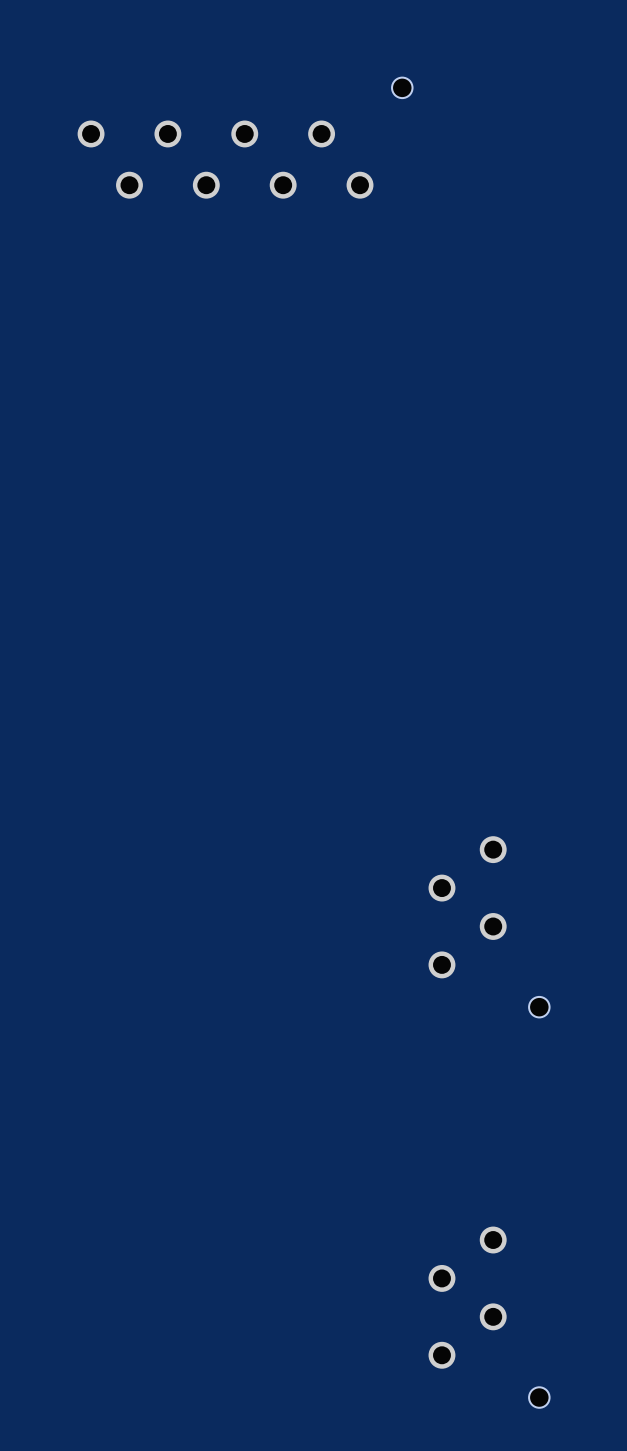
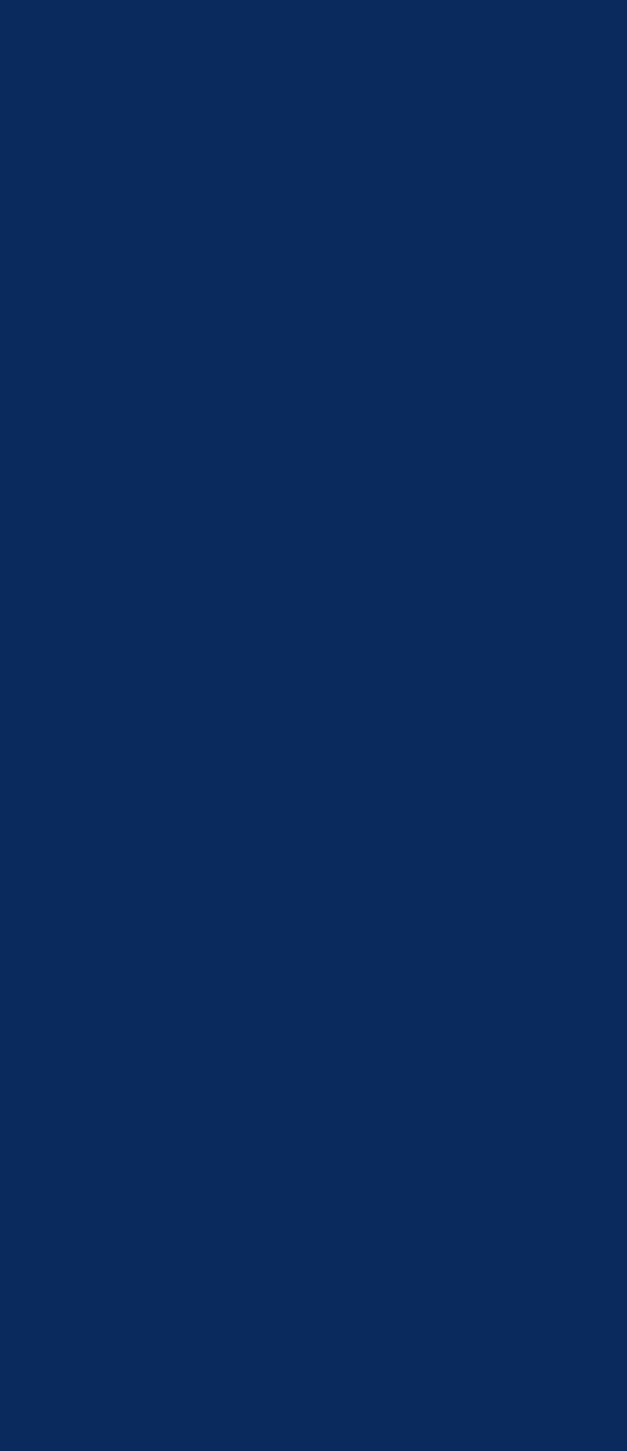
part: (245, 138) -> none
part: (489, 926) -> none
part: (489, 1317) -> none

